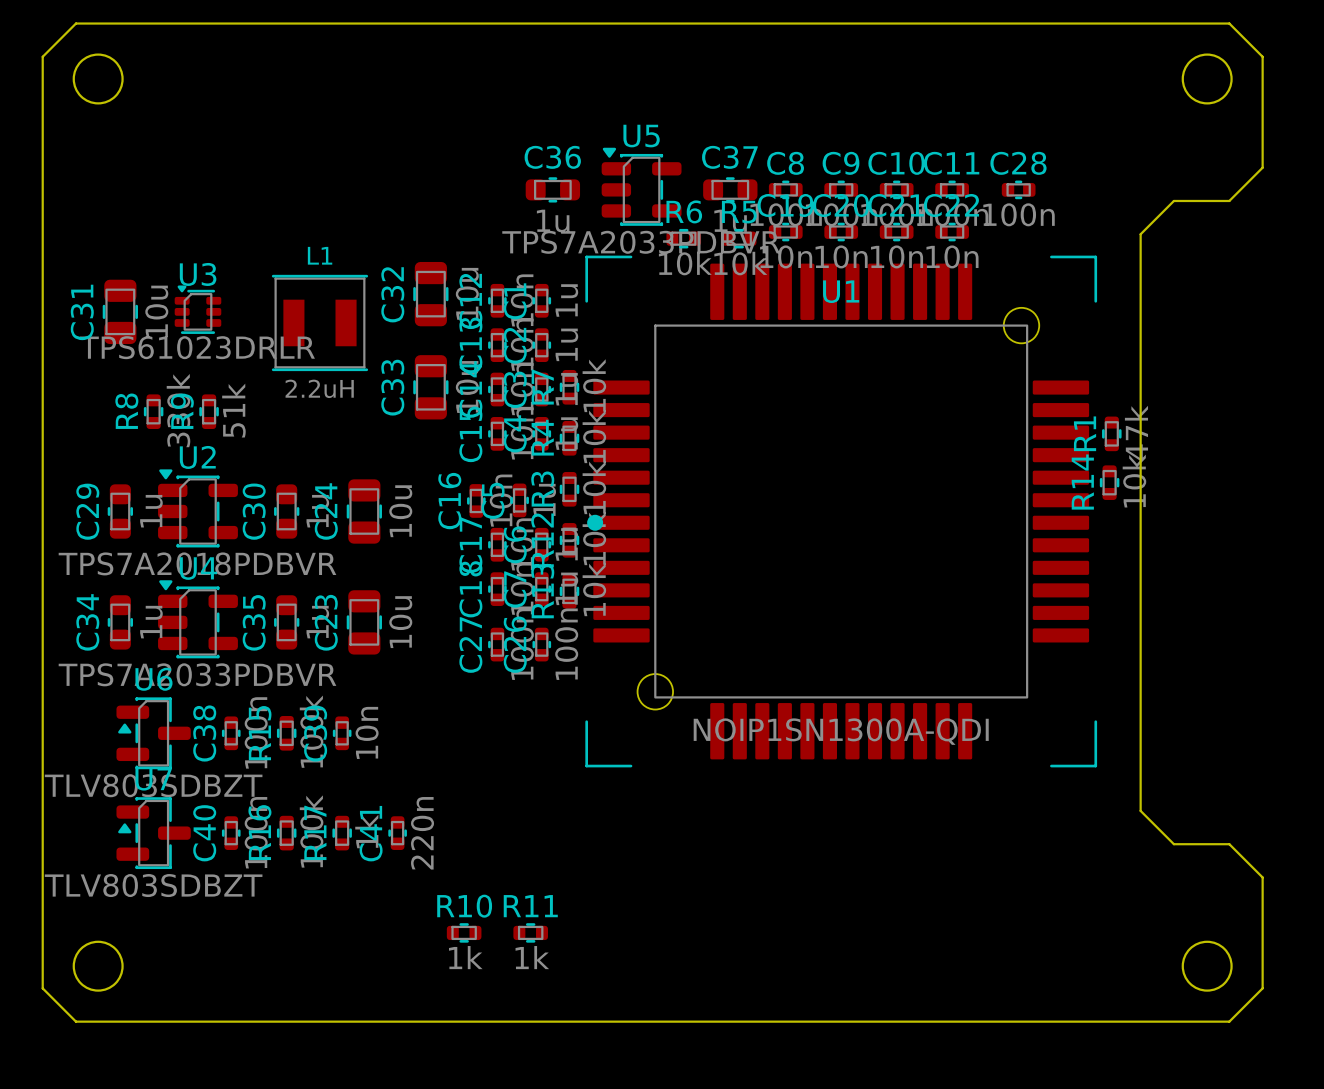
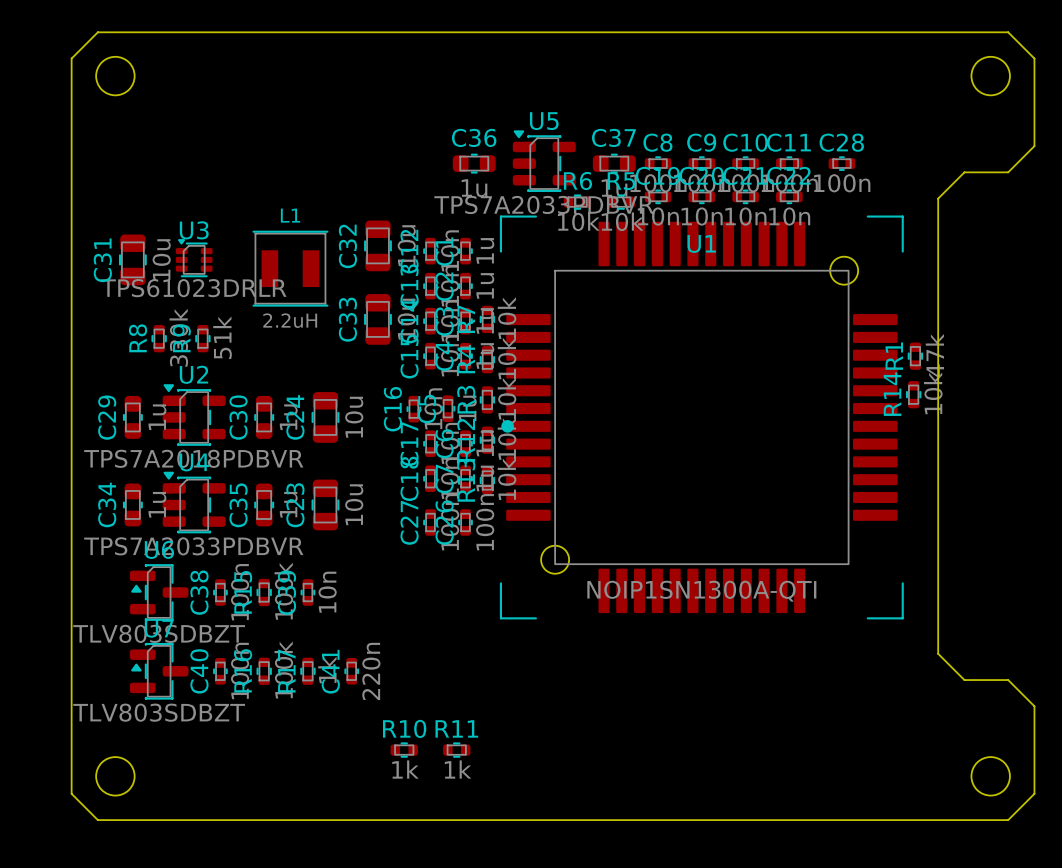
U1 value: NOIP1SN1300A-QDI (841, 731) -> NOIP1SN1300A-QTI (701, 591)

